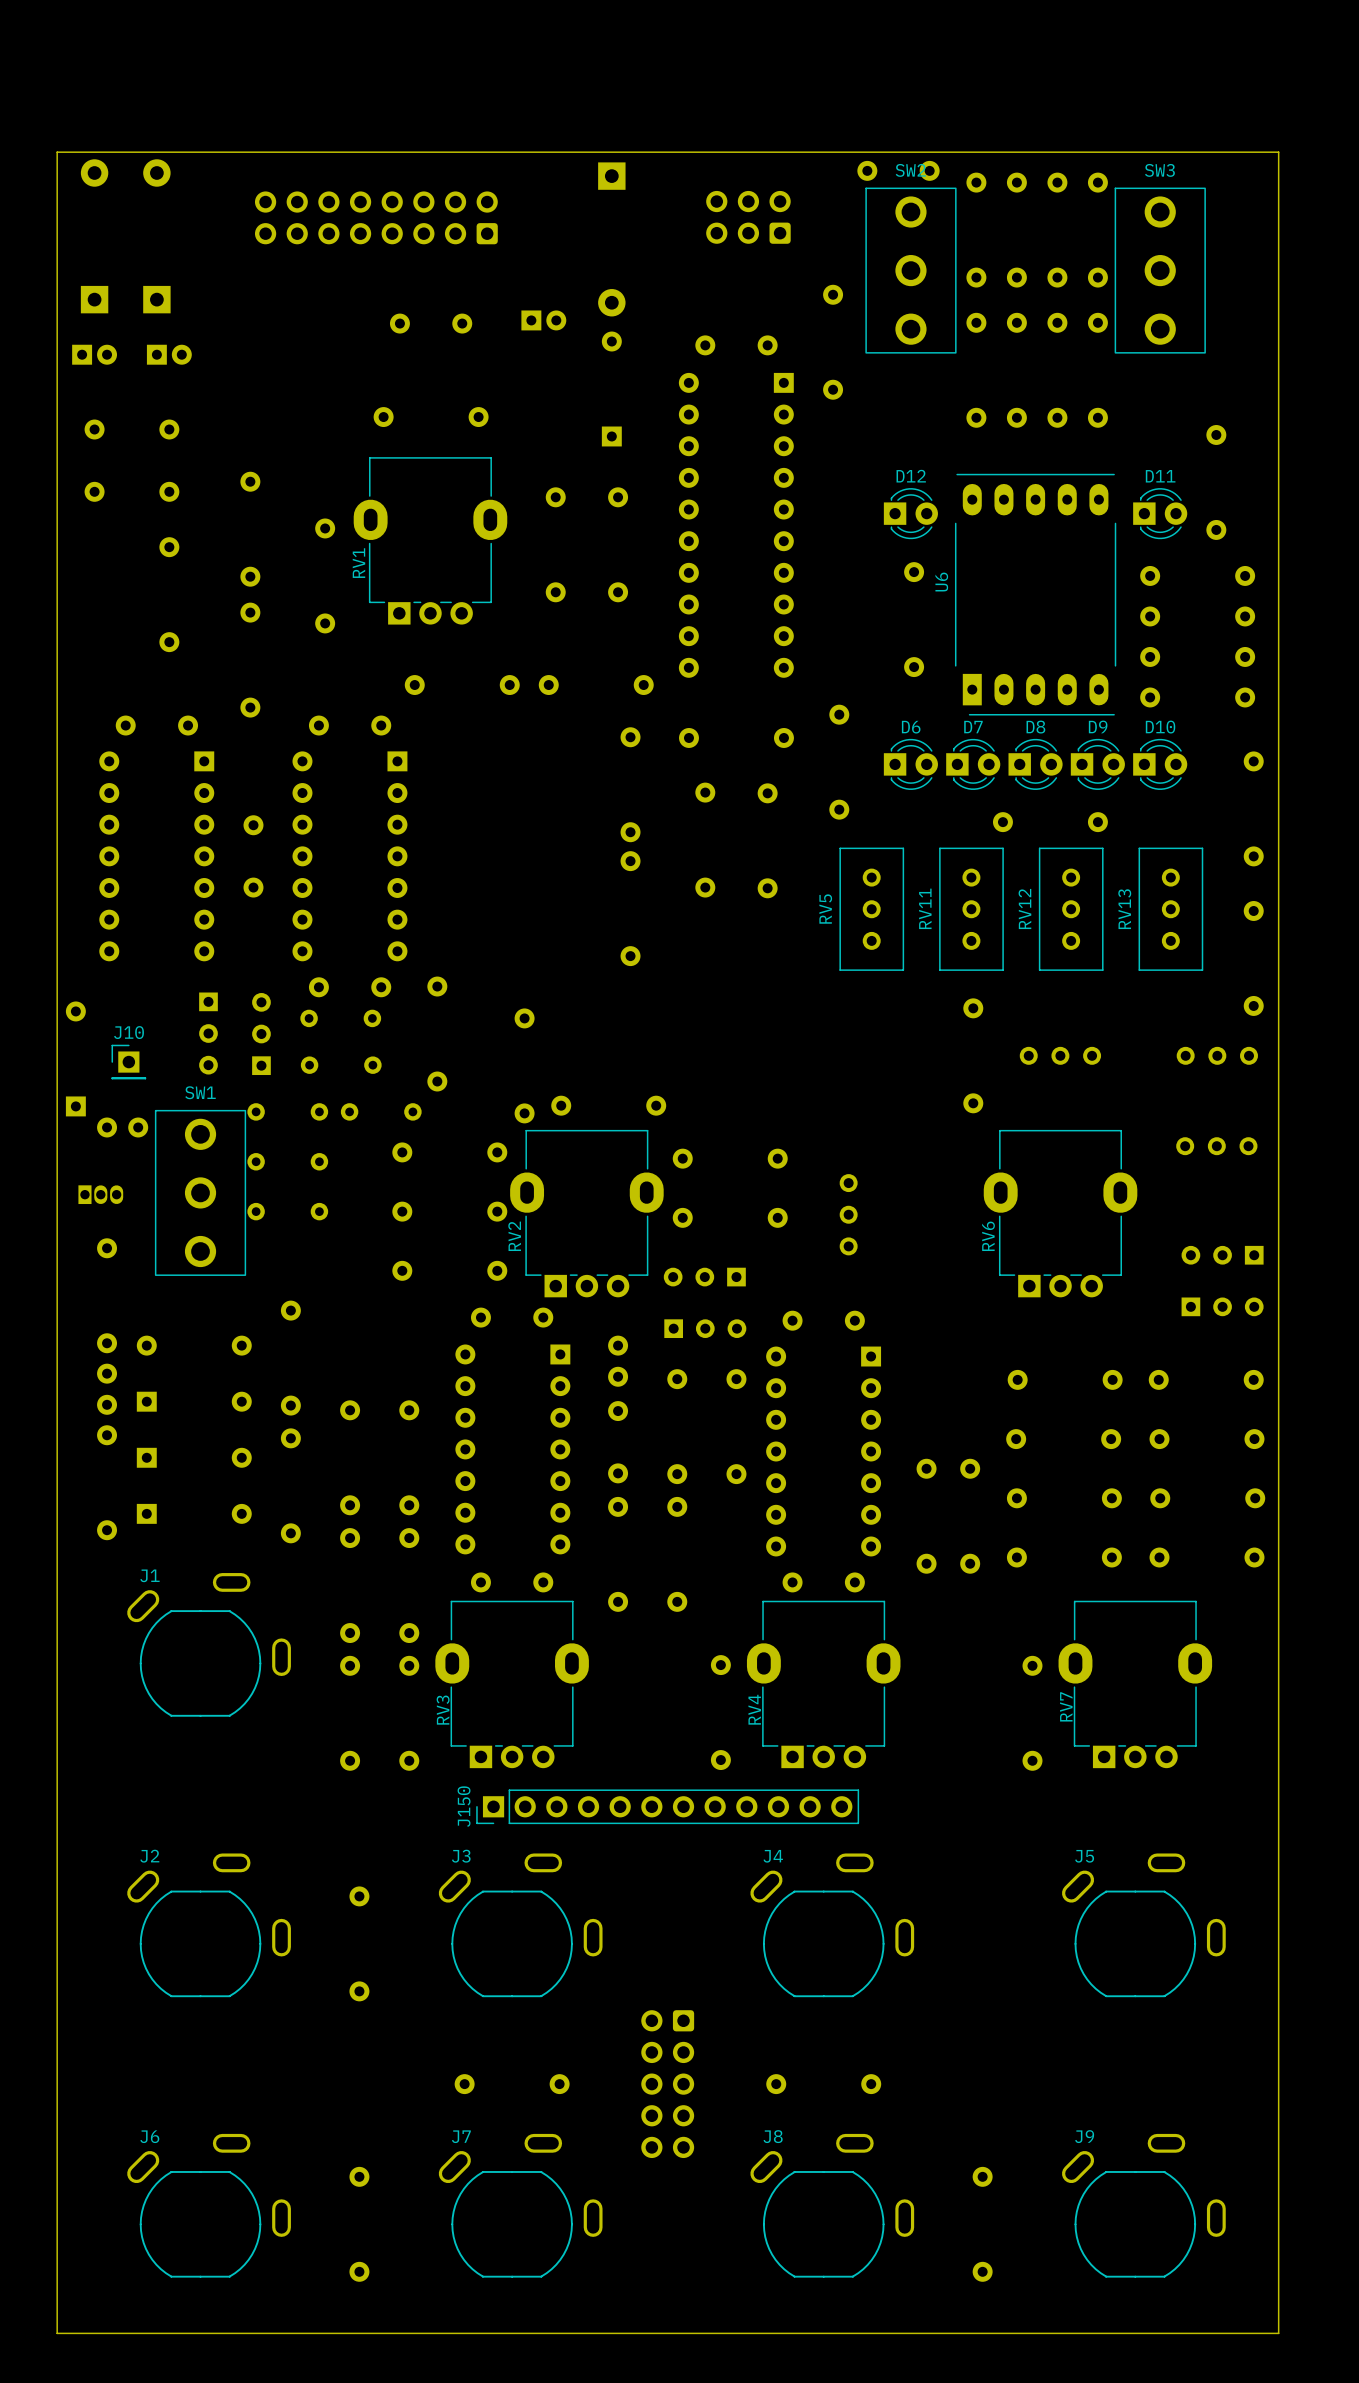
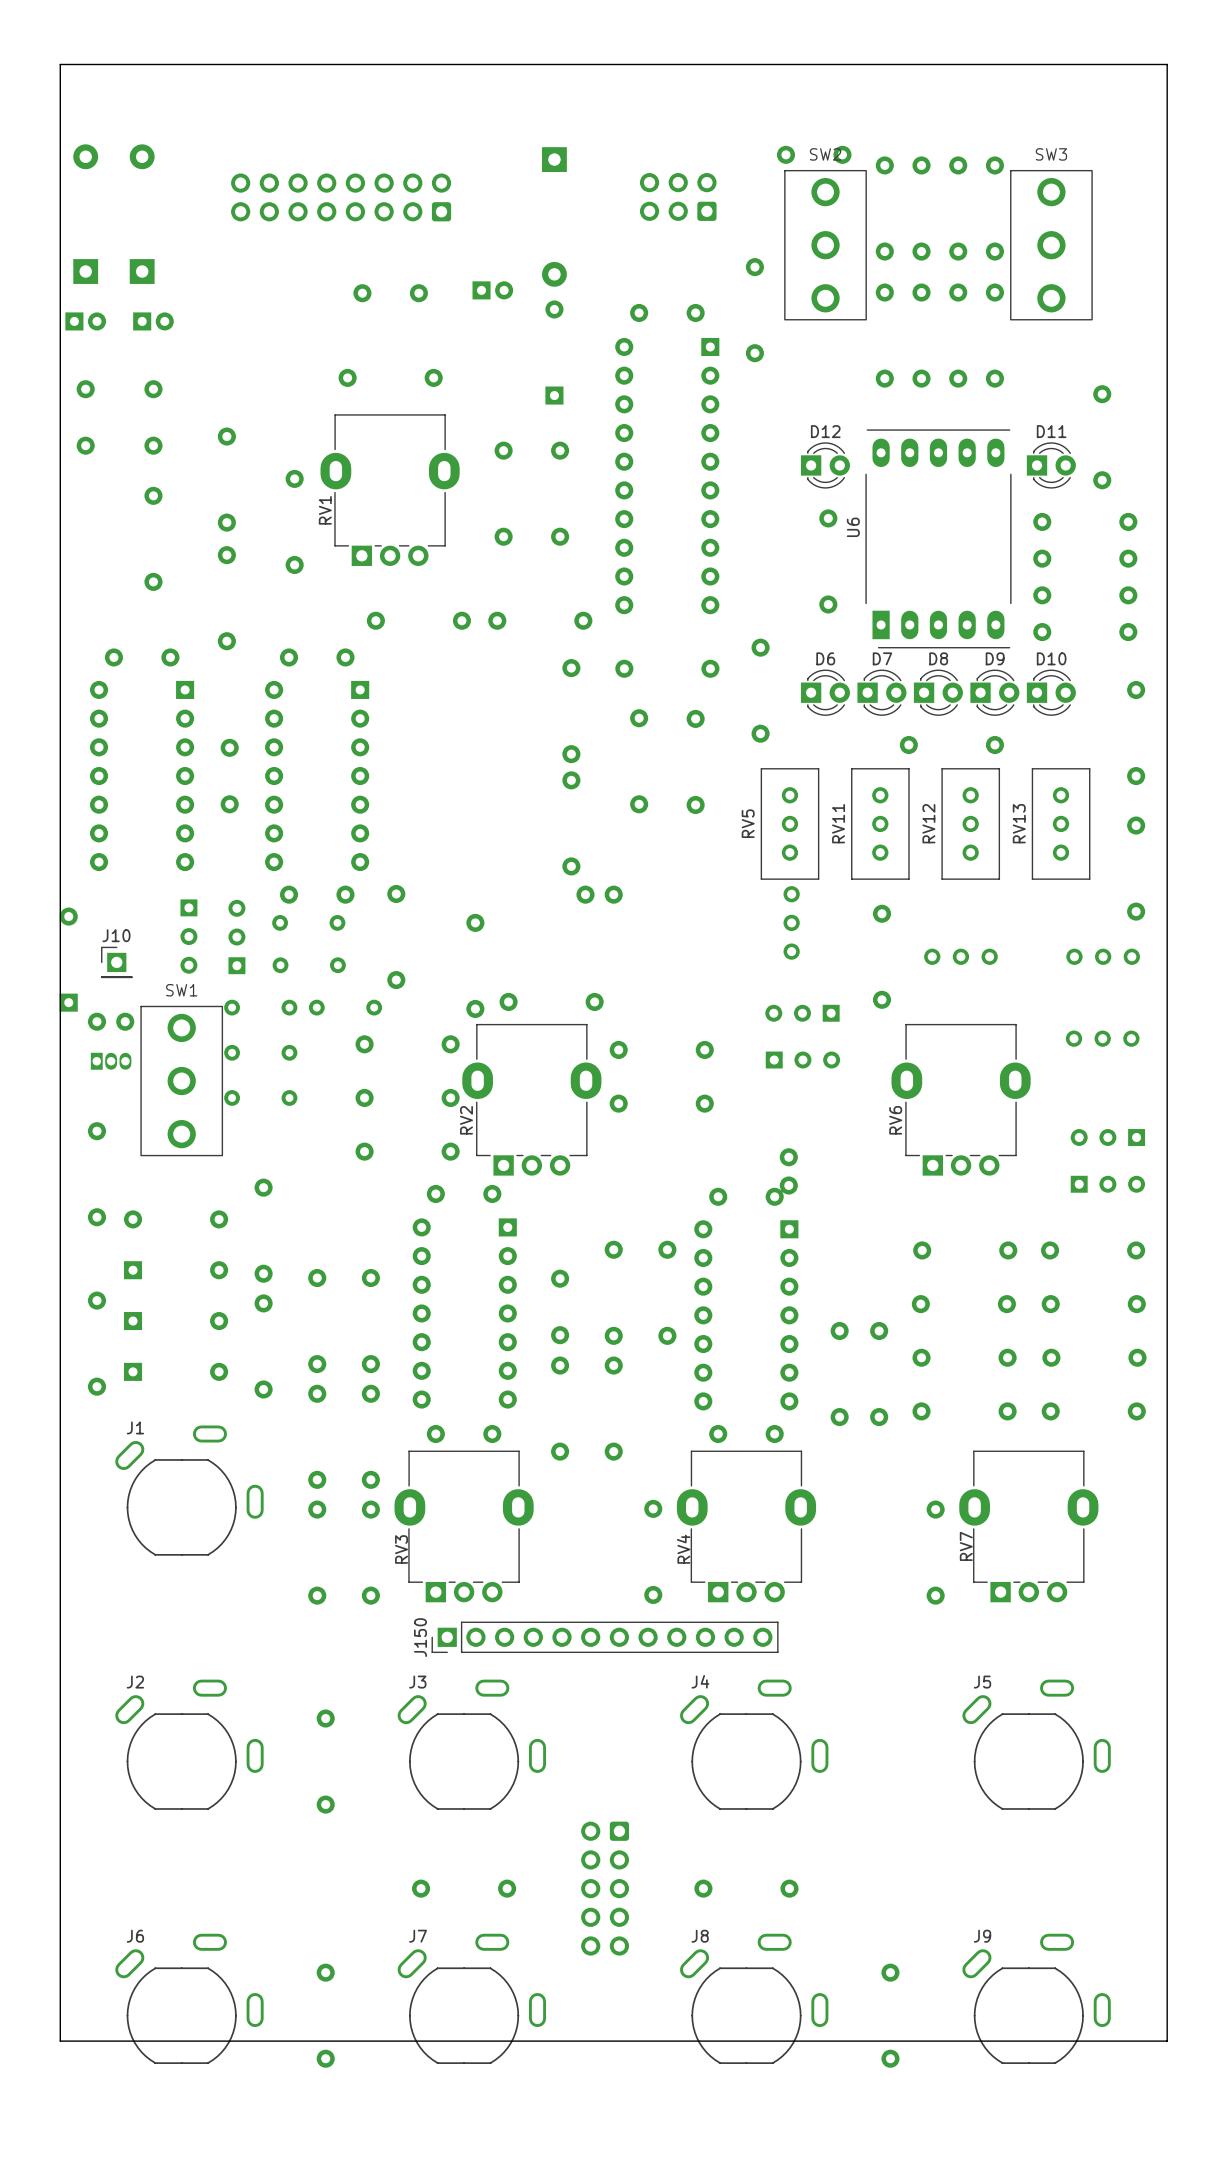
board edge: (57, 152) (1278, 152) (1278, 2333) (57, 2333) (57, 152) -> (60, 64) (1167, 64) (1167, 2041) (60, 2041) (60, 64)
part: none -> (599, 894)
part: none -> (802, 1013)
part: none -> (802, 1060)
part position: (100, 1194) -> (111, 1061)
part position: (848, 1214) -> (791, 922)
part: (704, 1277) -> none
part: none -> (788, 1171)
part: (705, 1328) -> none
part: (618, 1361) -> none
part: (107, 1389) -> none

